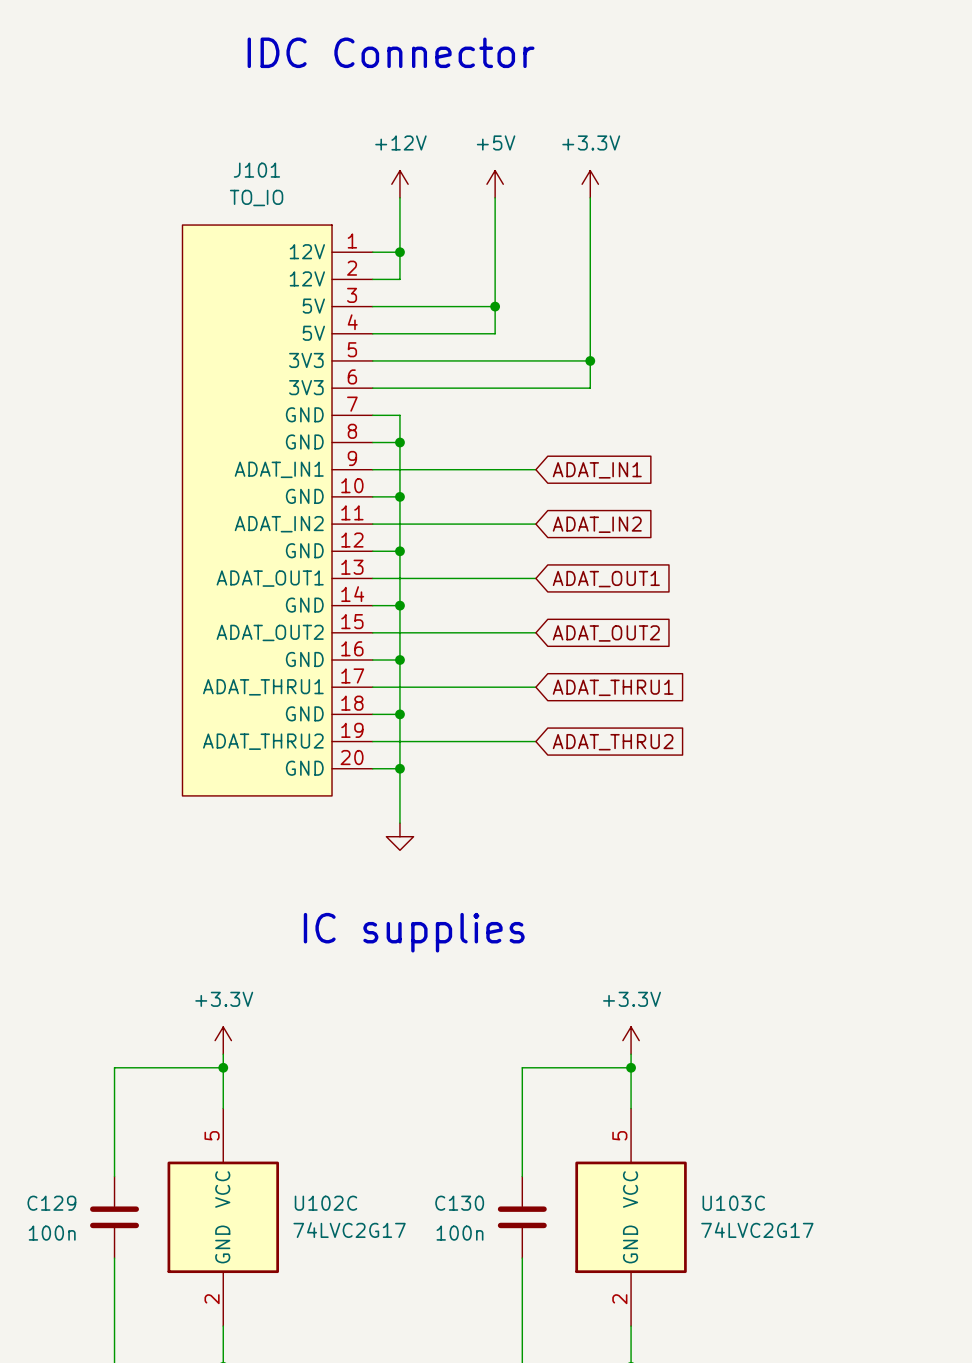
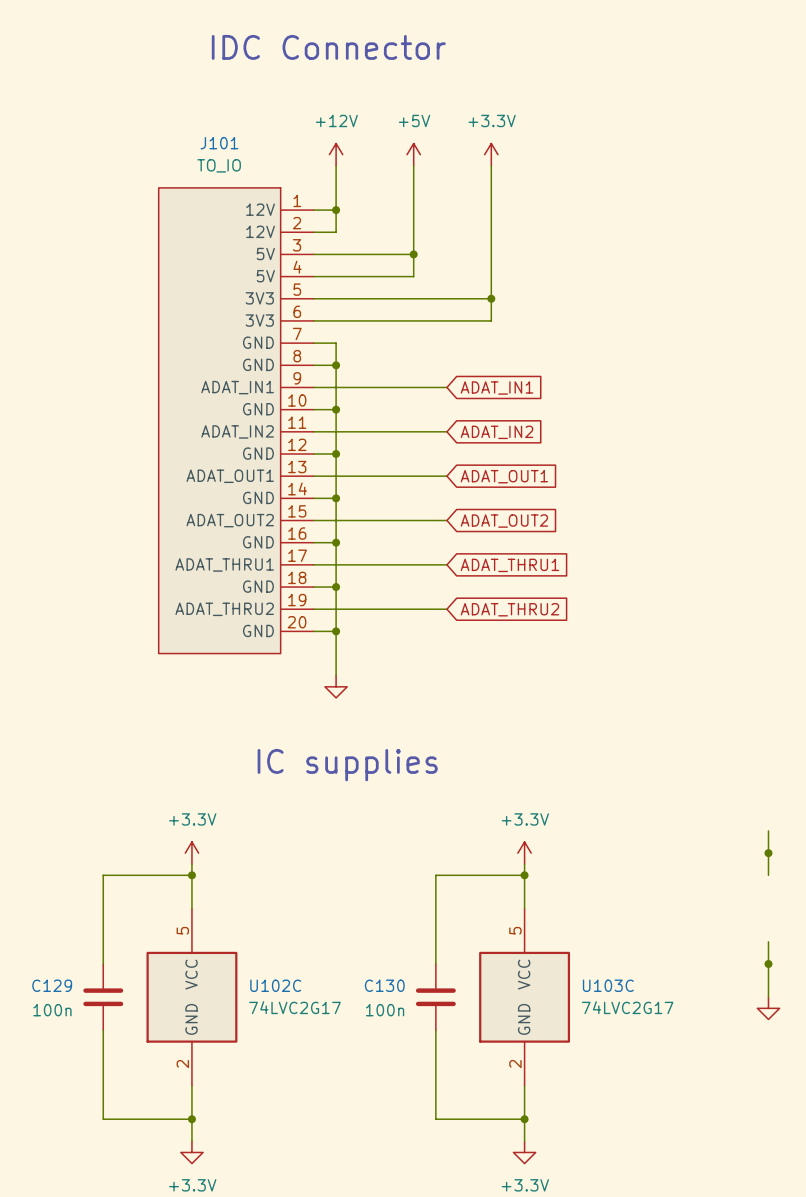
wire: none -> (768, 830) (768, 875)
junction: none -> (768, 853)
wire: none -> (768, 941) (768, 997)
junction: none -> (768, 964)
power symbol: none -> (768, 1008)

